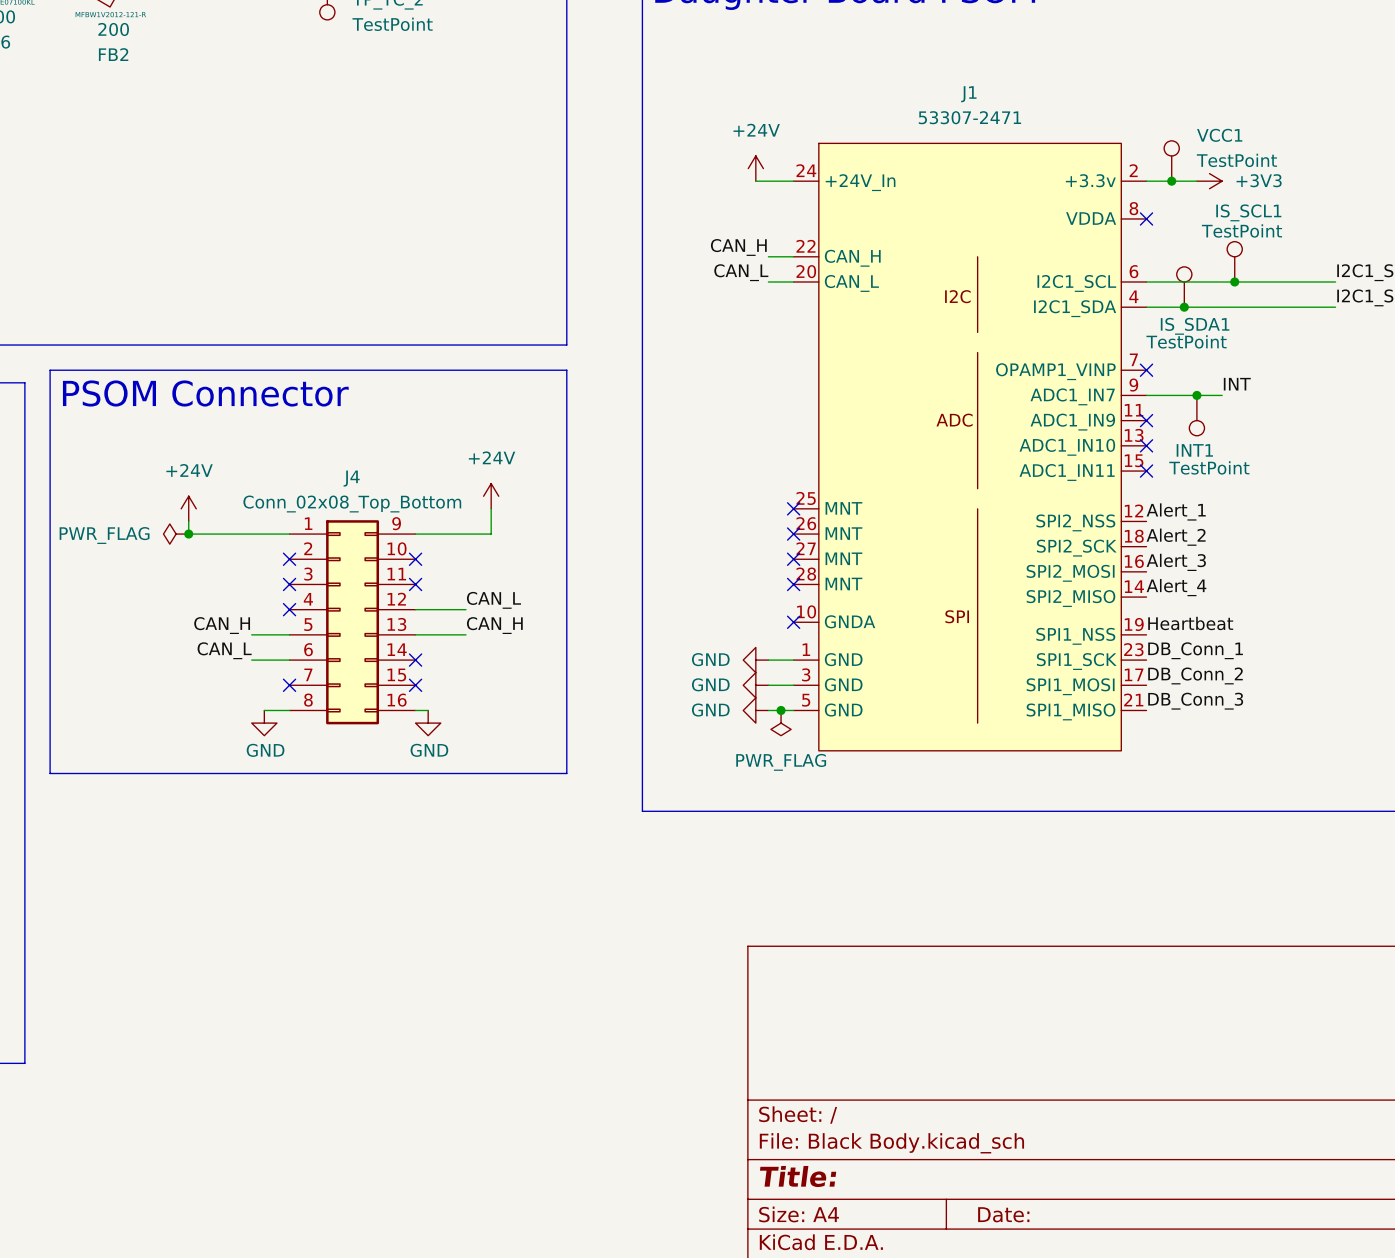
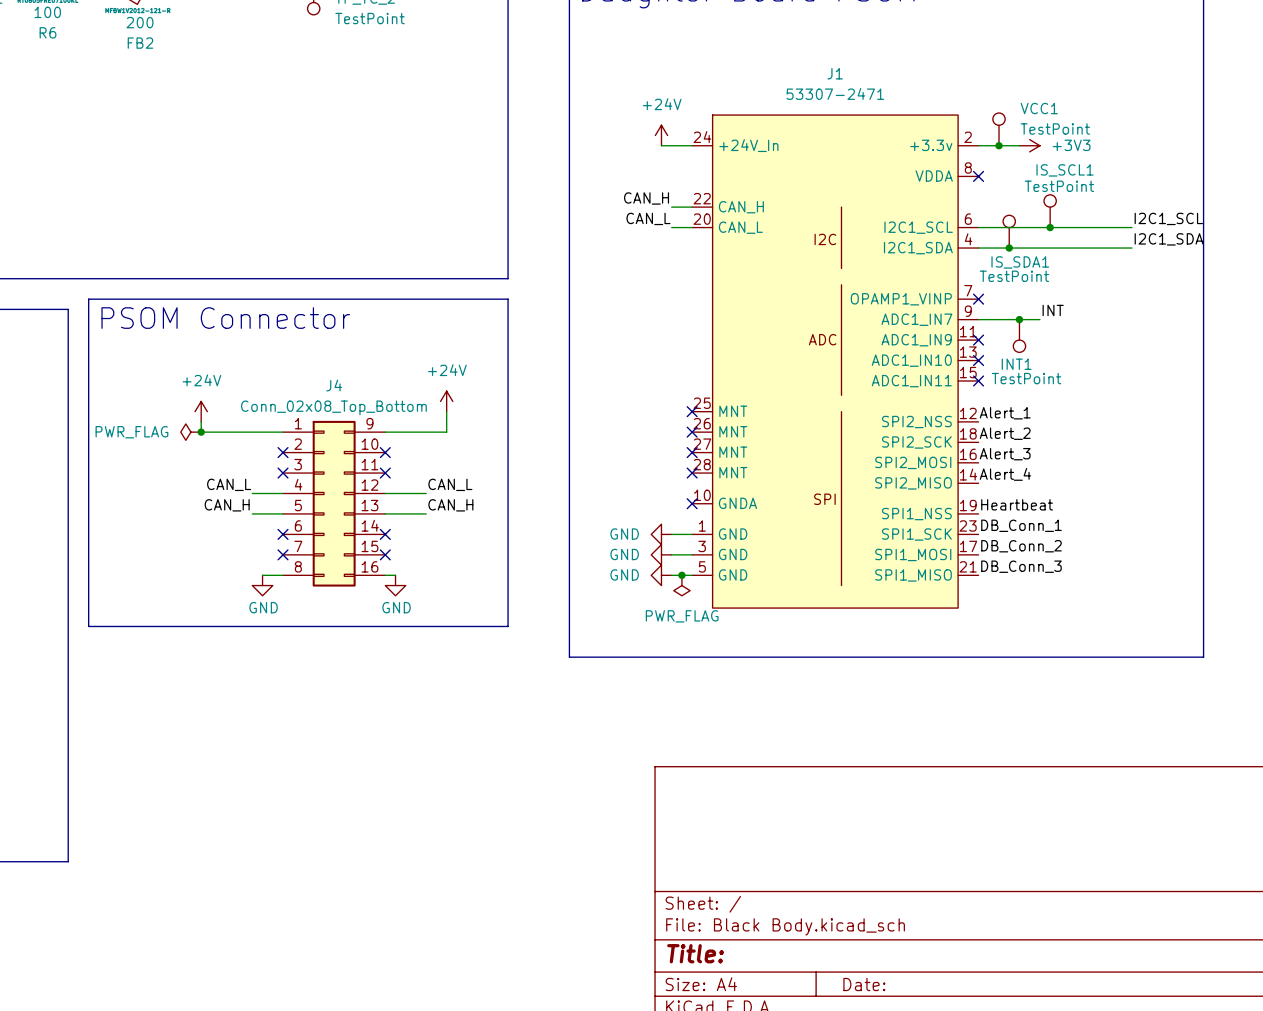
no-connect mark position: (289, 609) -> (283, 534)
label position: CAN_L (224, 650) -> CAN_L (229, 484)
wire: (251, 660) (289, 660) -> (252, 493) (283, 493)

